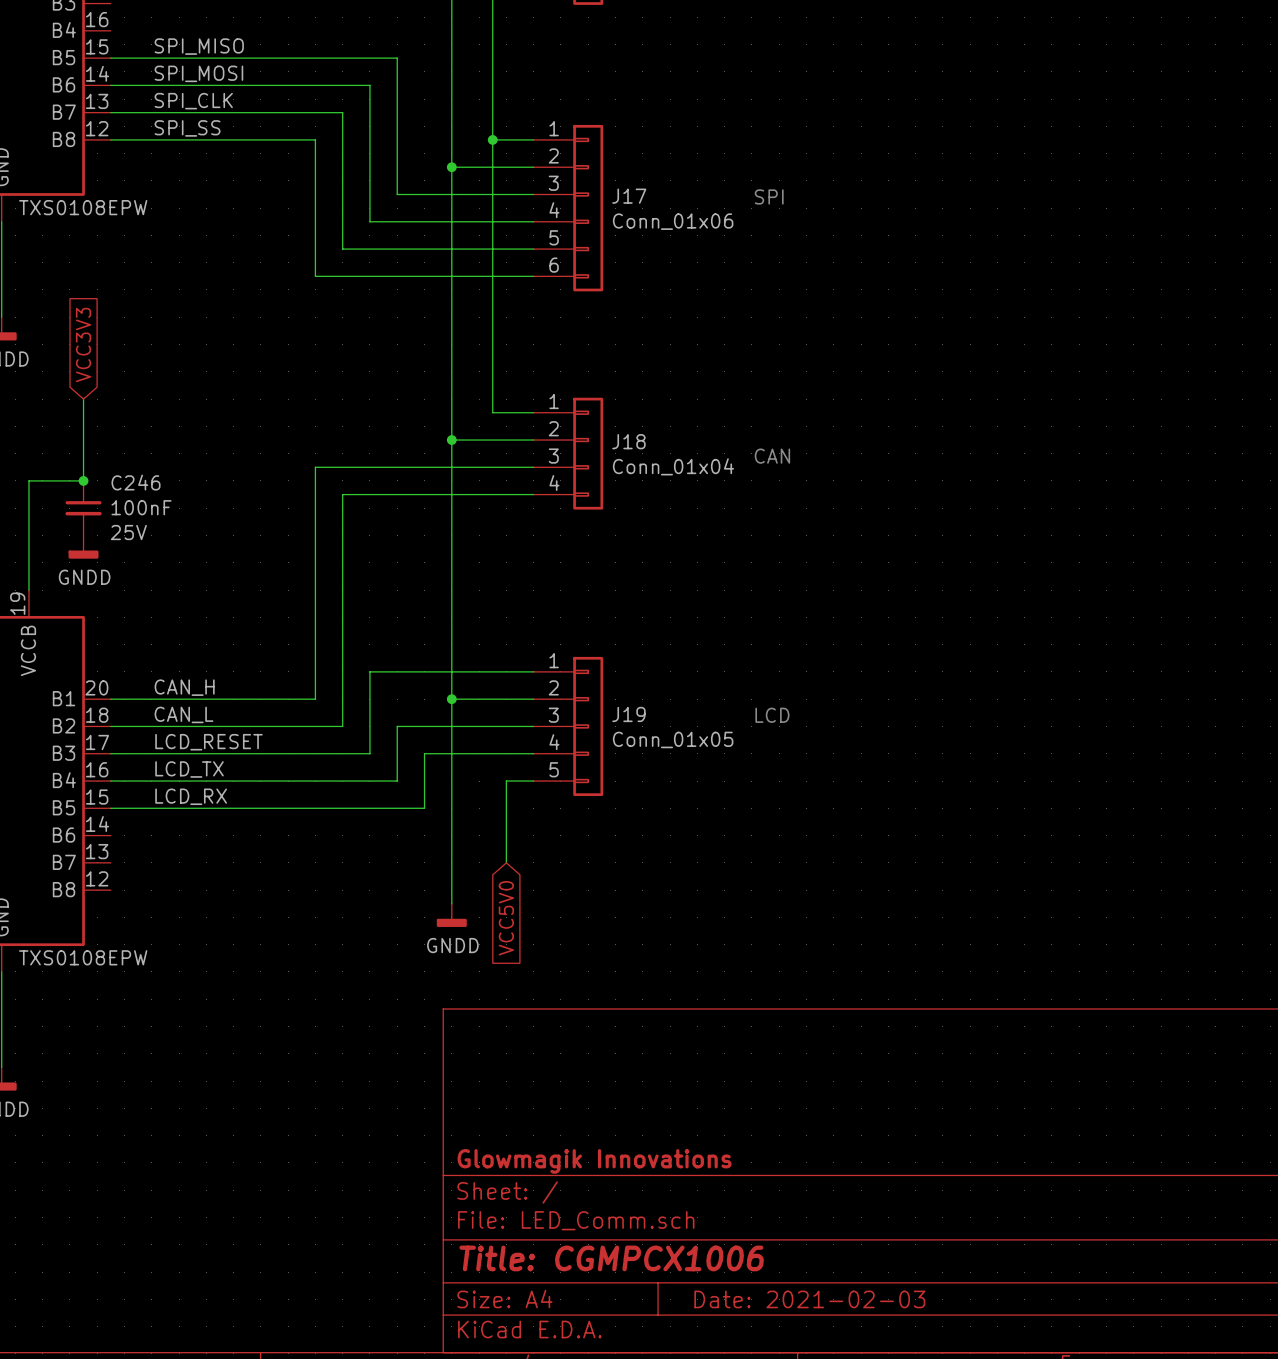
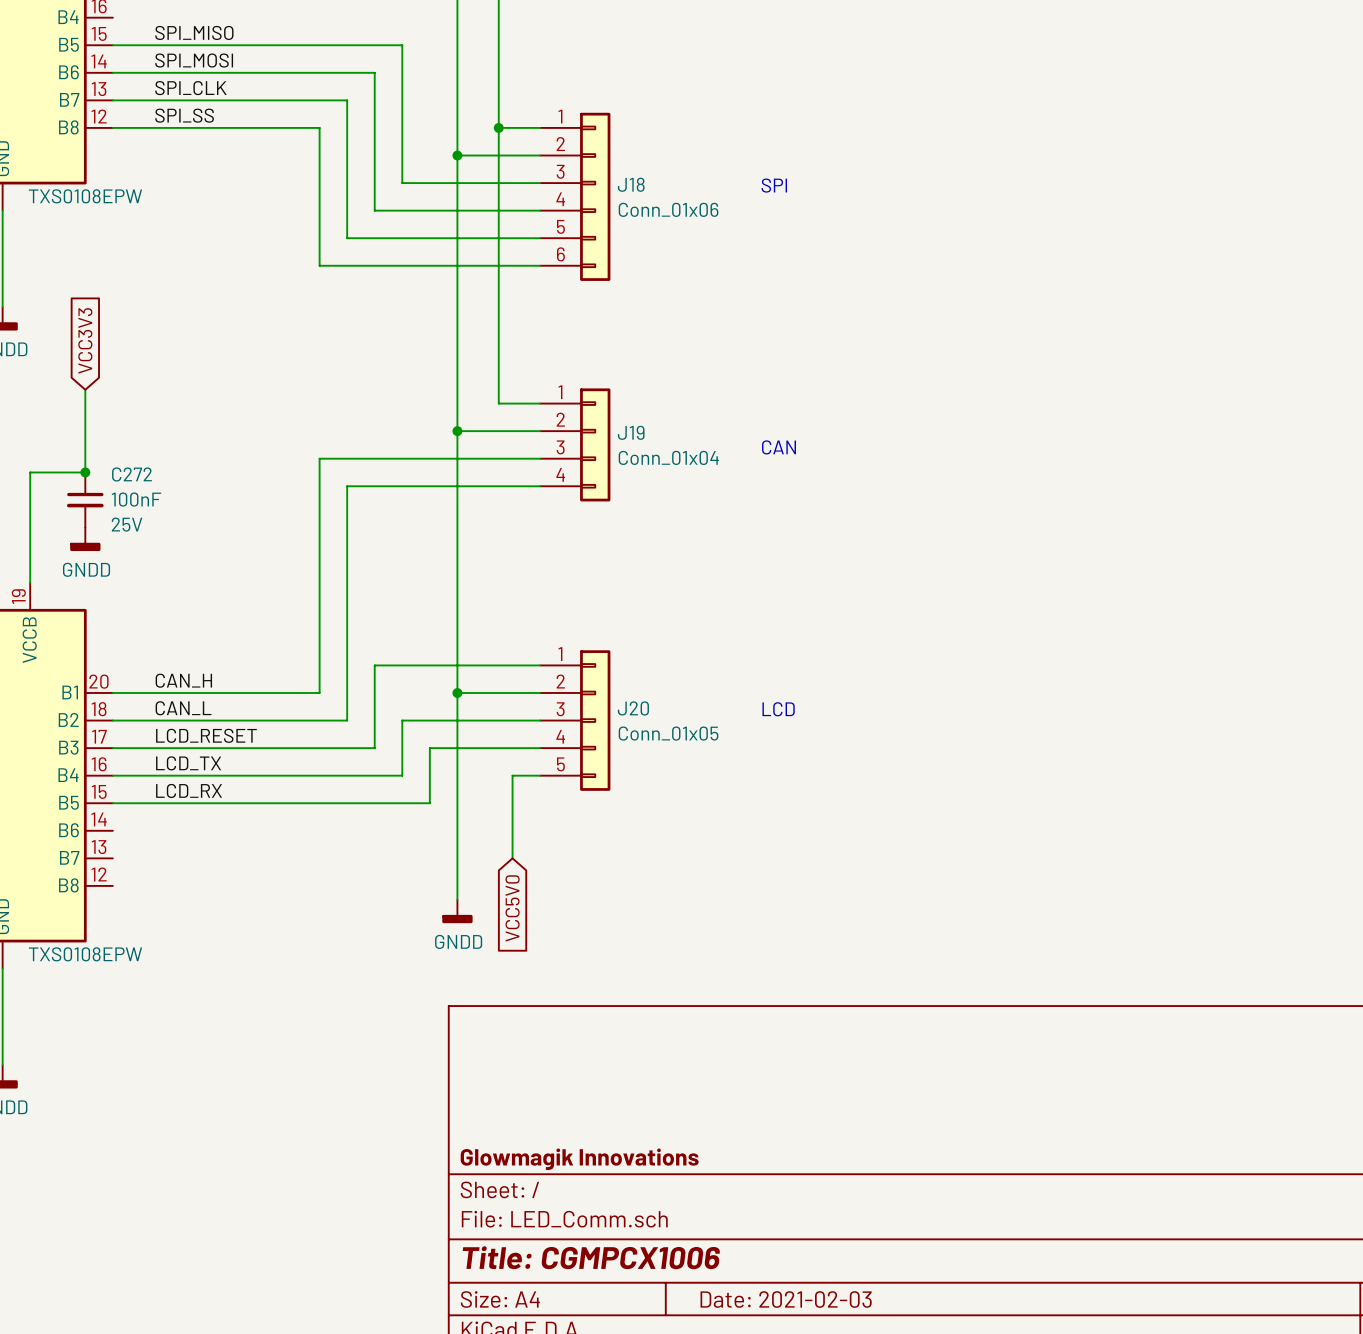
J17 name: J17 (629, 196) -> J18 (631, 184)
J18 name: J18 (628, 441) -> J19 (631, 432)
C246 name: C246 (136, 482) -> C272 (132, 474)
J19 name: J19 (628, 714) -> J20 (633, 708)

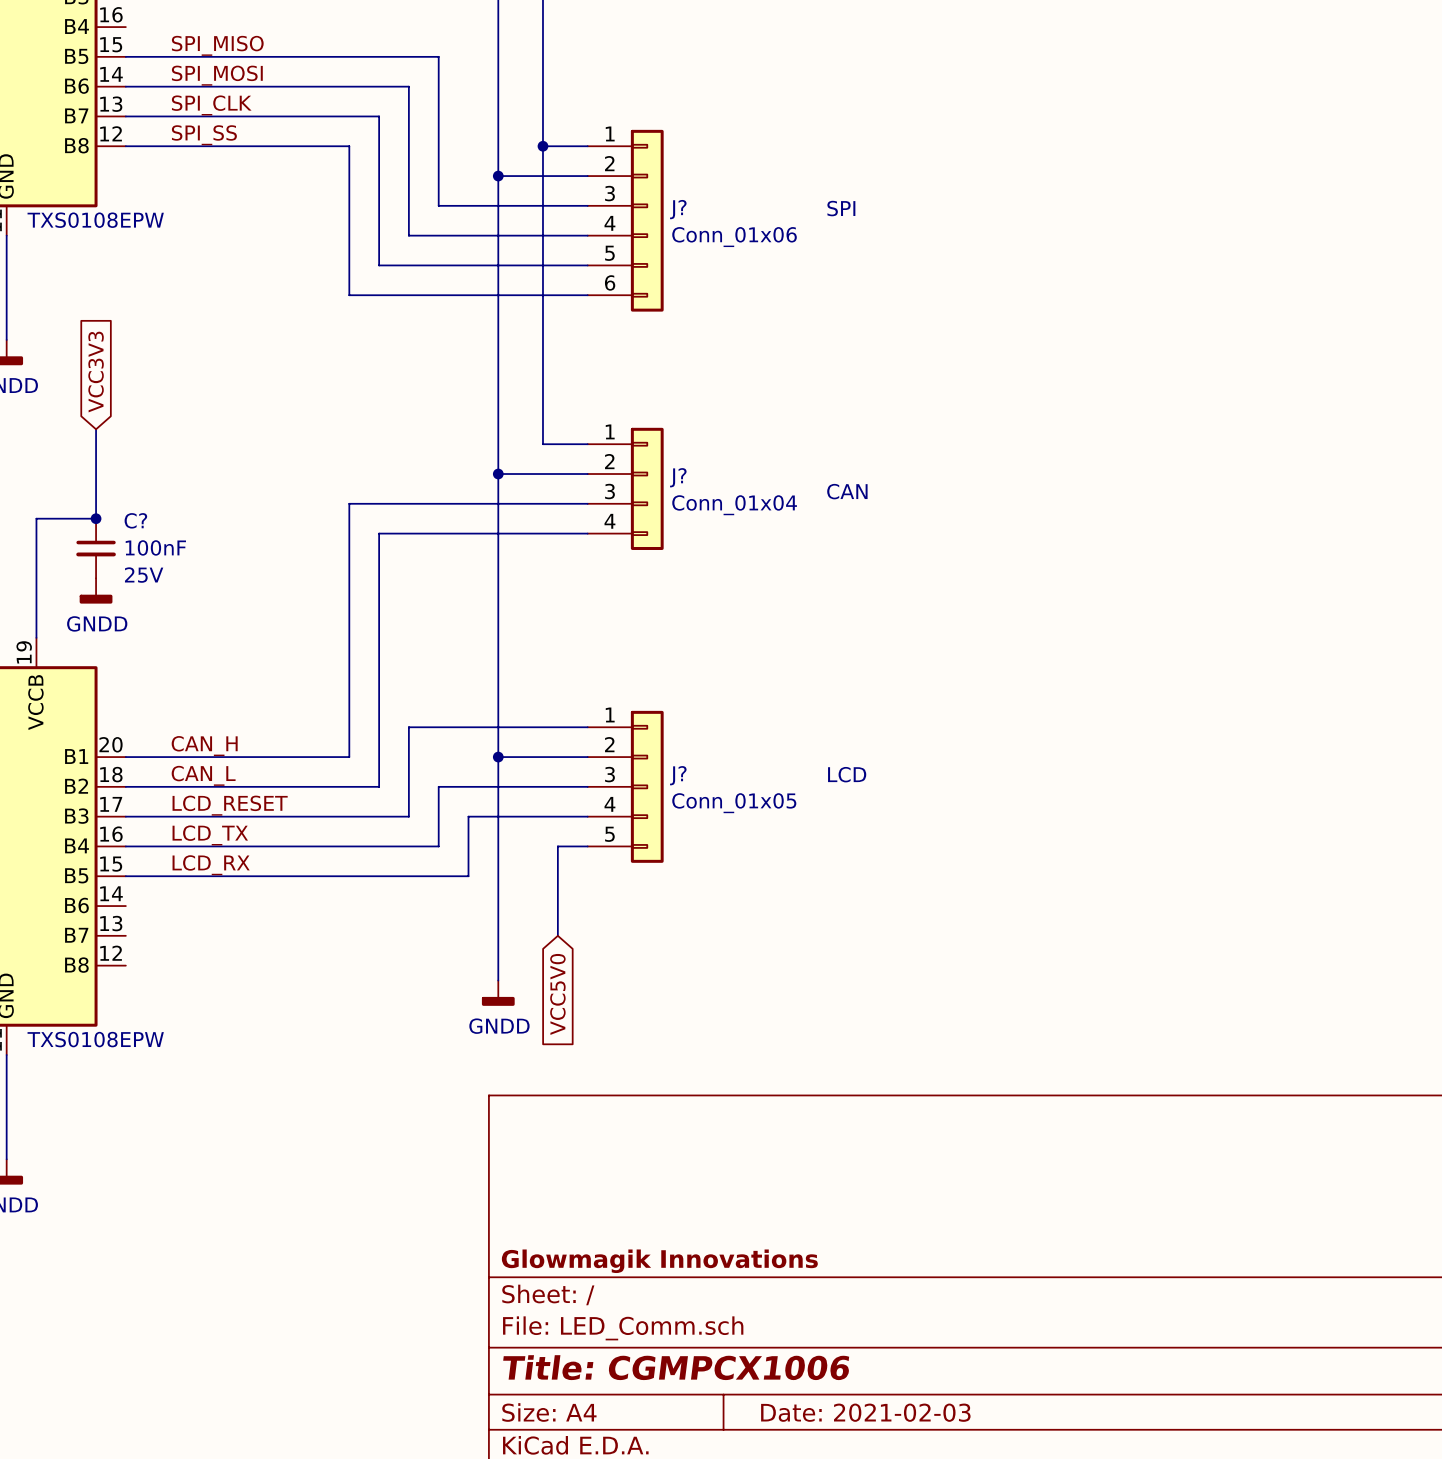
J18 name: J18 (631, 184) -> J? (678, 209)
J19 name: J19 (631, 432) -> J? (678, 477)
C272 name: C272 (132, 474) -> C? (135, 520)
J20 name: J20 (633, 708) -> J? (678, 775)

